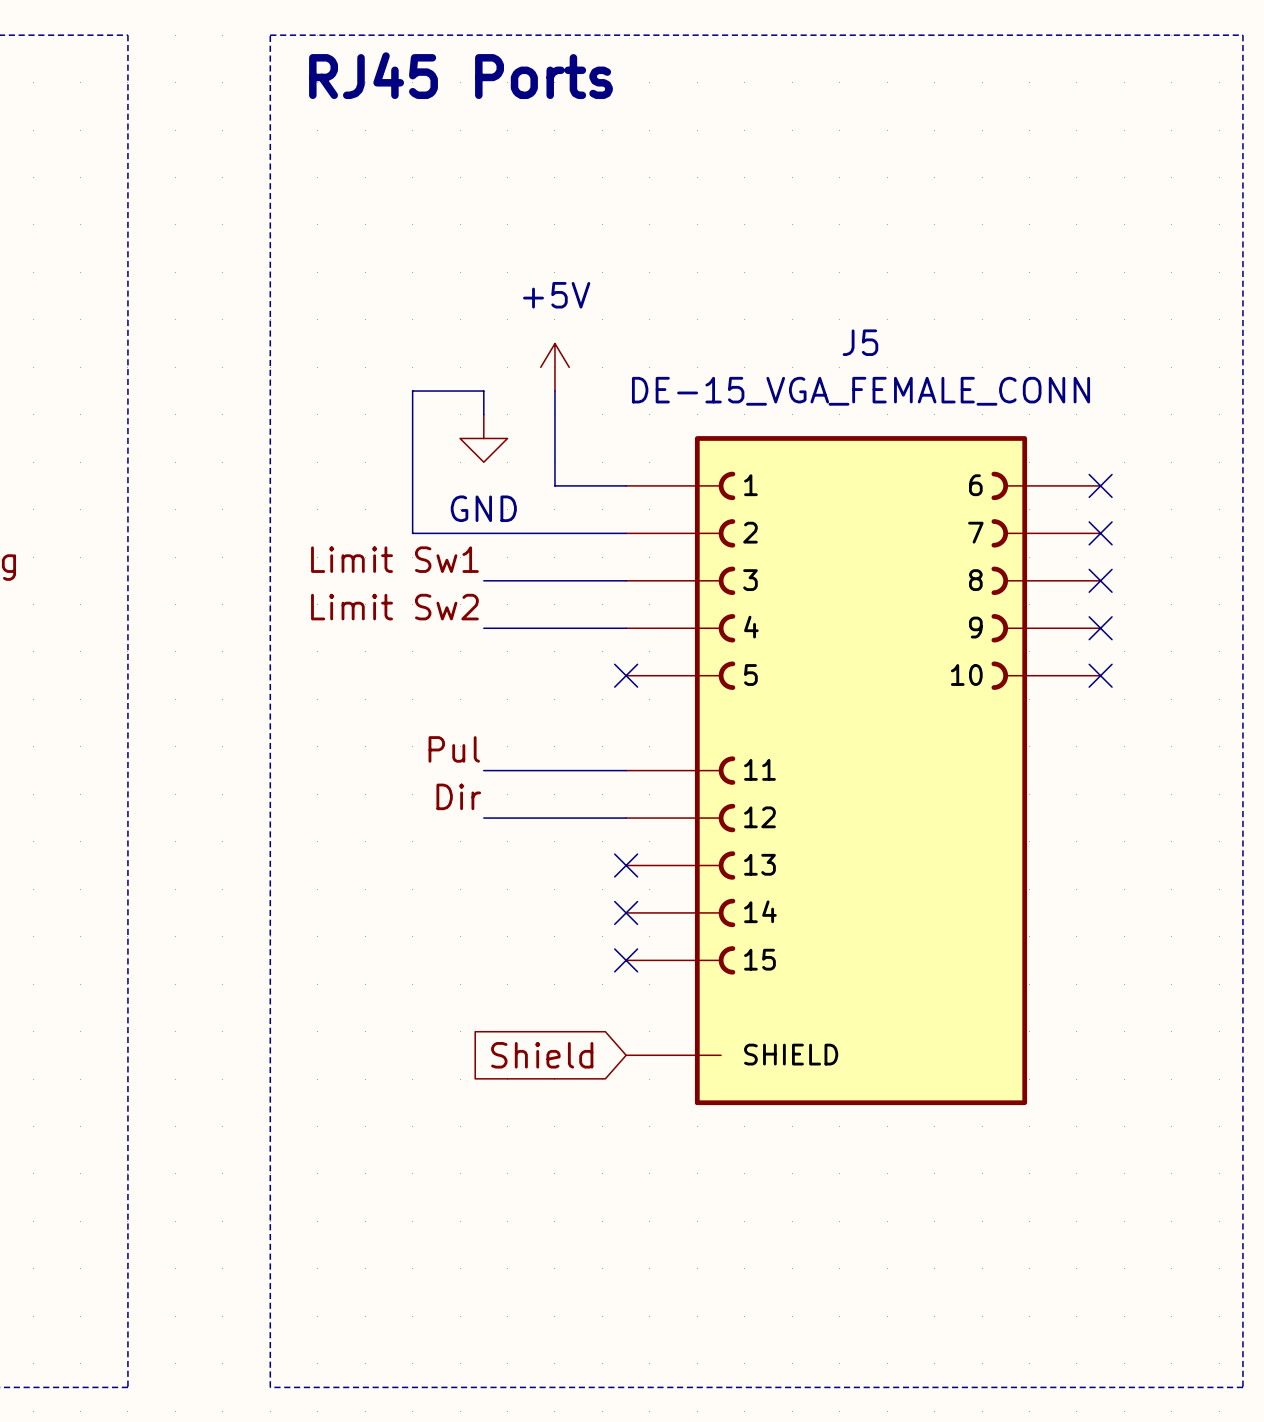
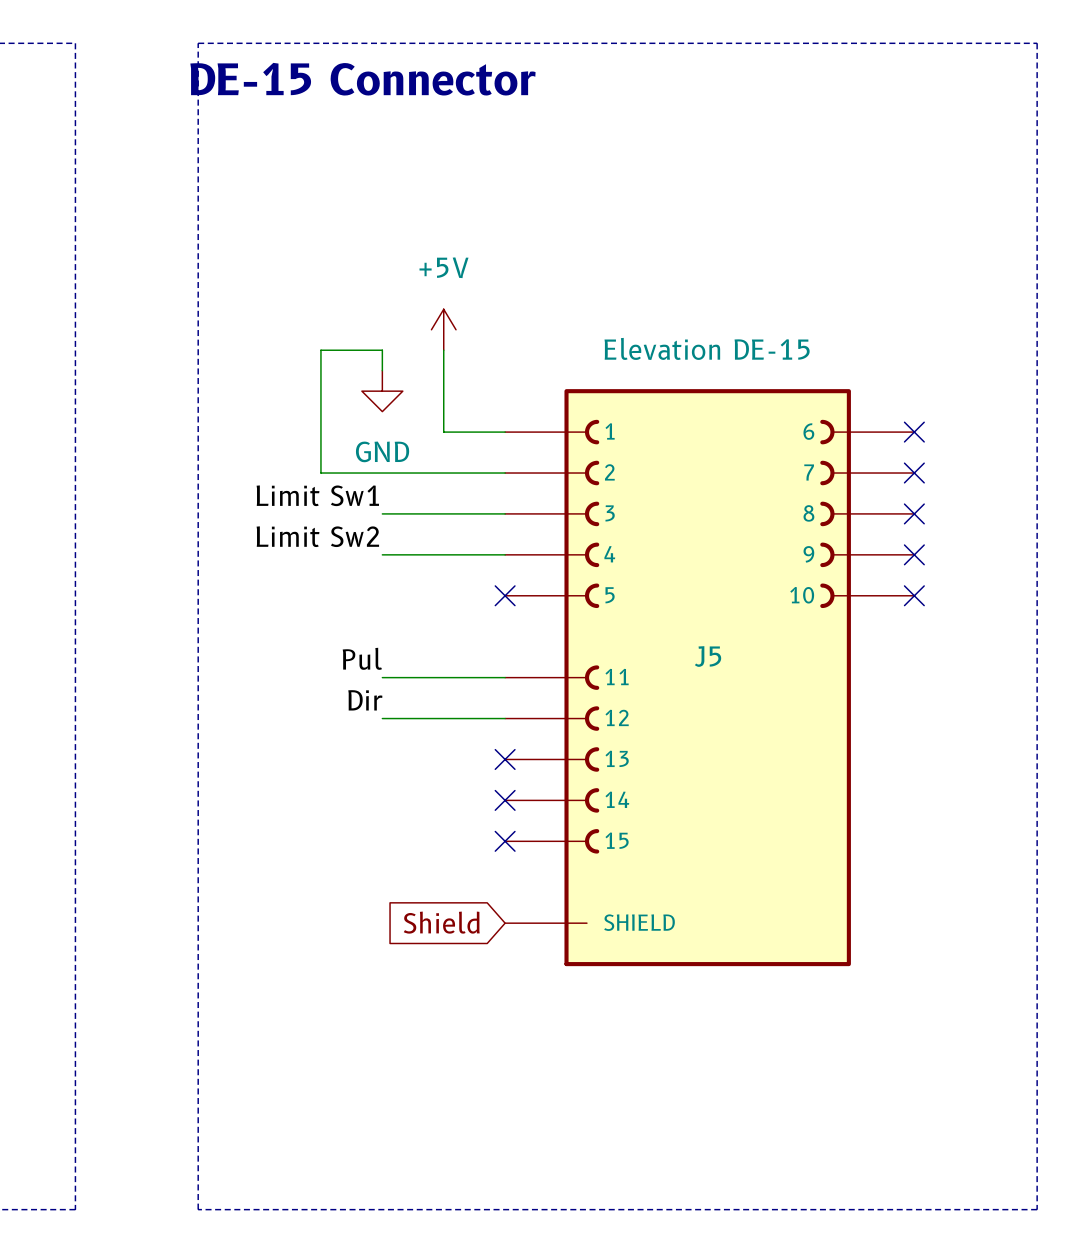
text: RJ45 Ports (460, 75) -> DE-15 Connector (362, 79)
J5 name position: J5 (860, 342) -> J5 (708, 656)
J5 value: DE-15_VGA_FEMALE_CONN (861, 391) -> Elevation DE-15 (707, 348)

